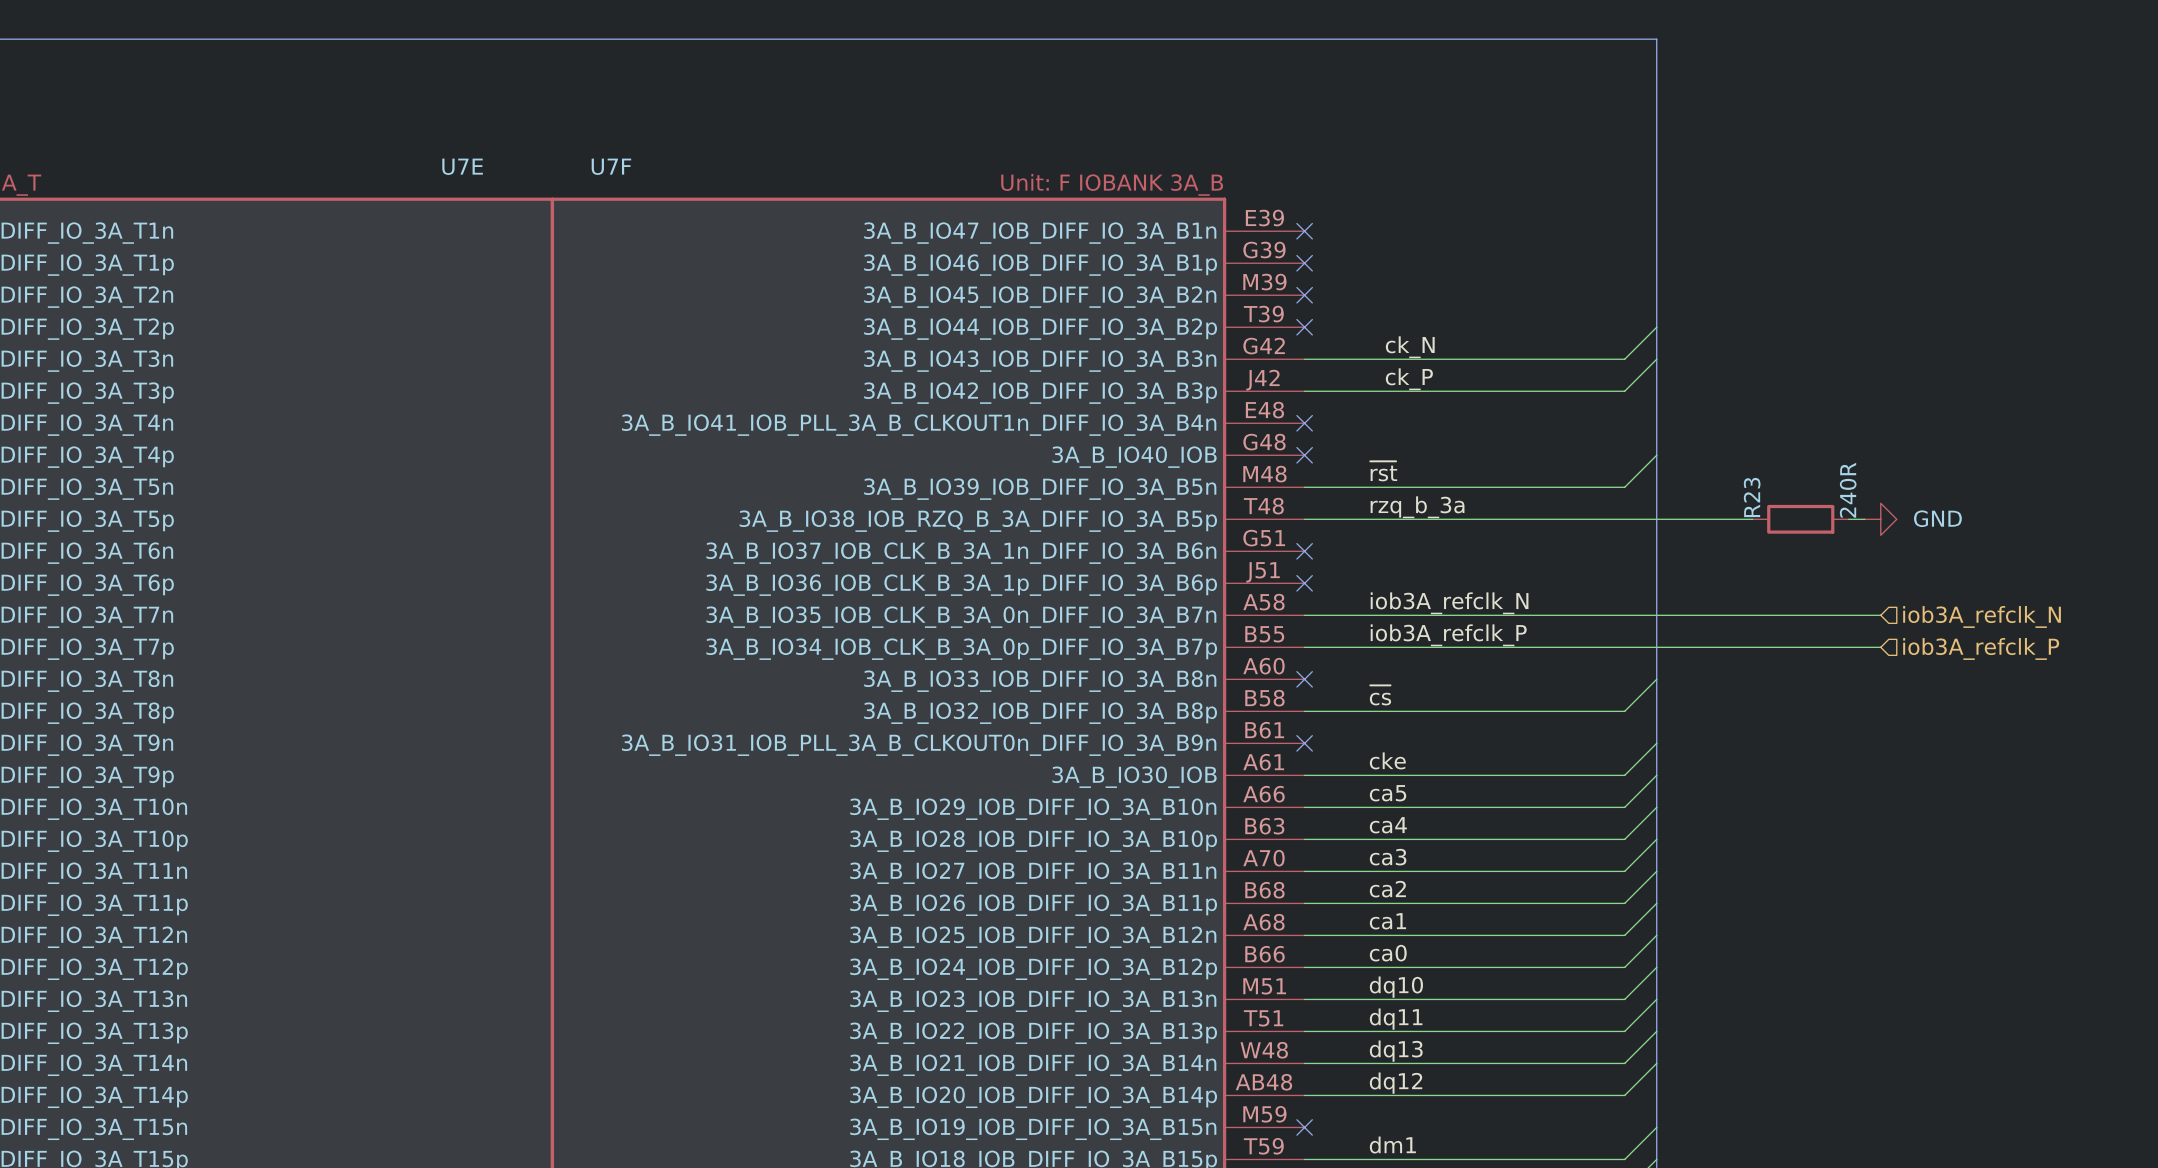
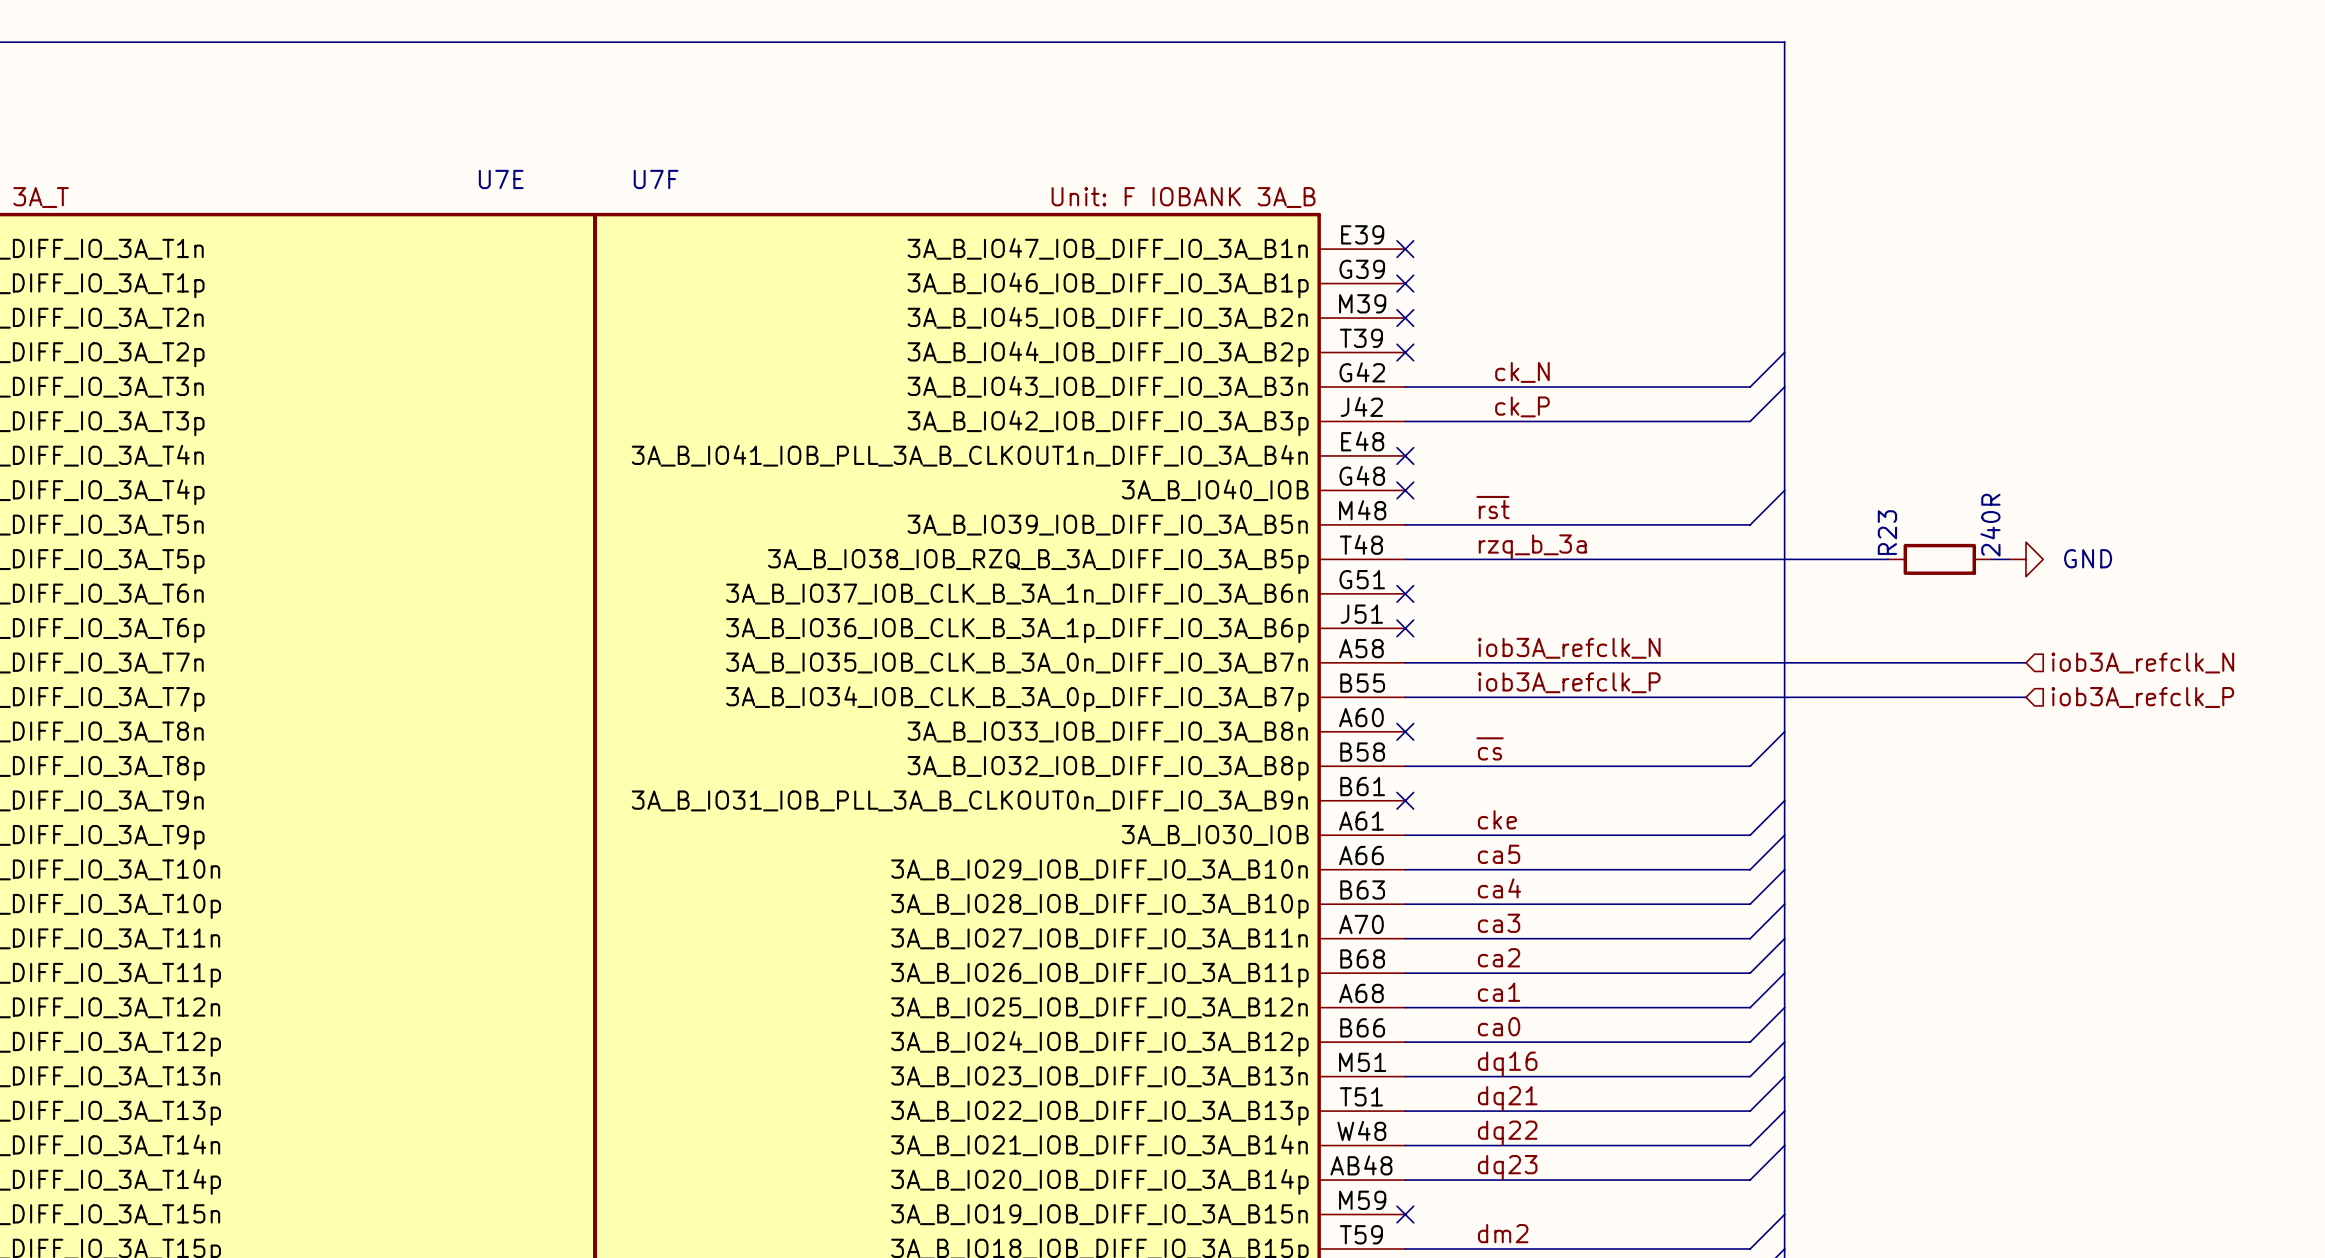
label: dq10 (1396, 987) -> dq16 (1507, 1064)
label: dq11 (1396, 1019) -> dq21 (1507, 1098)
label: dq13 (1396, 1051) -> dq22 (1507, 1133)
label: dq12 (1396, 1083) -> dq23 (1507, 1167)
label: dm1 (1392, 1145) -> dm2 (1503, 1233)

